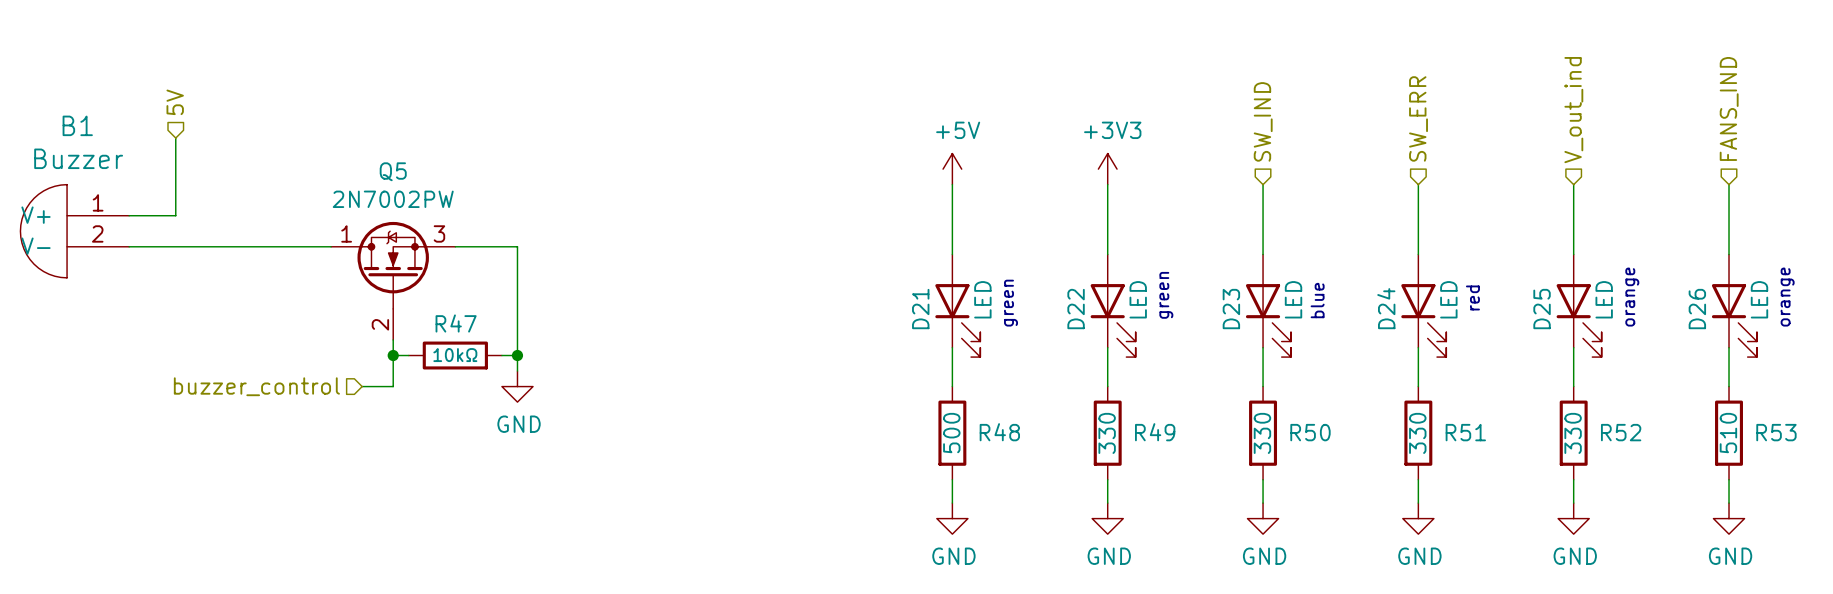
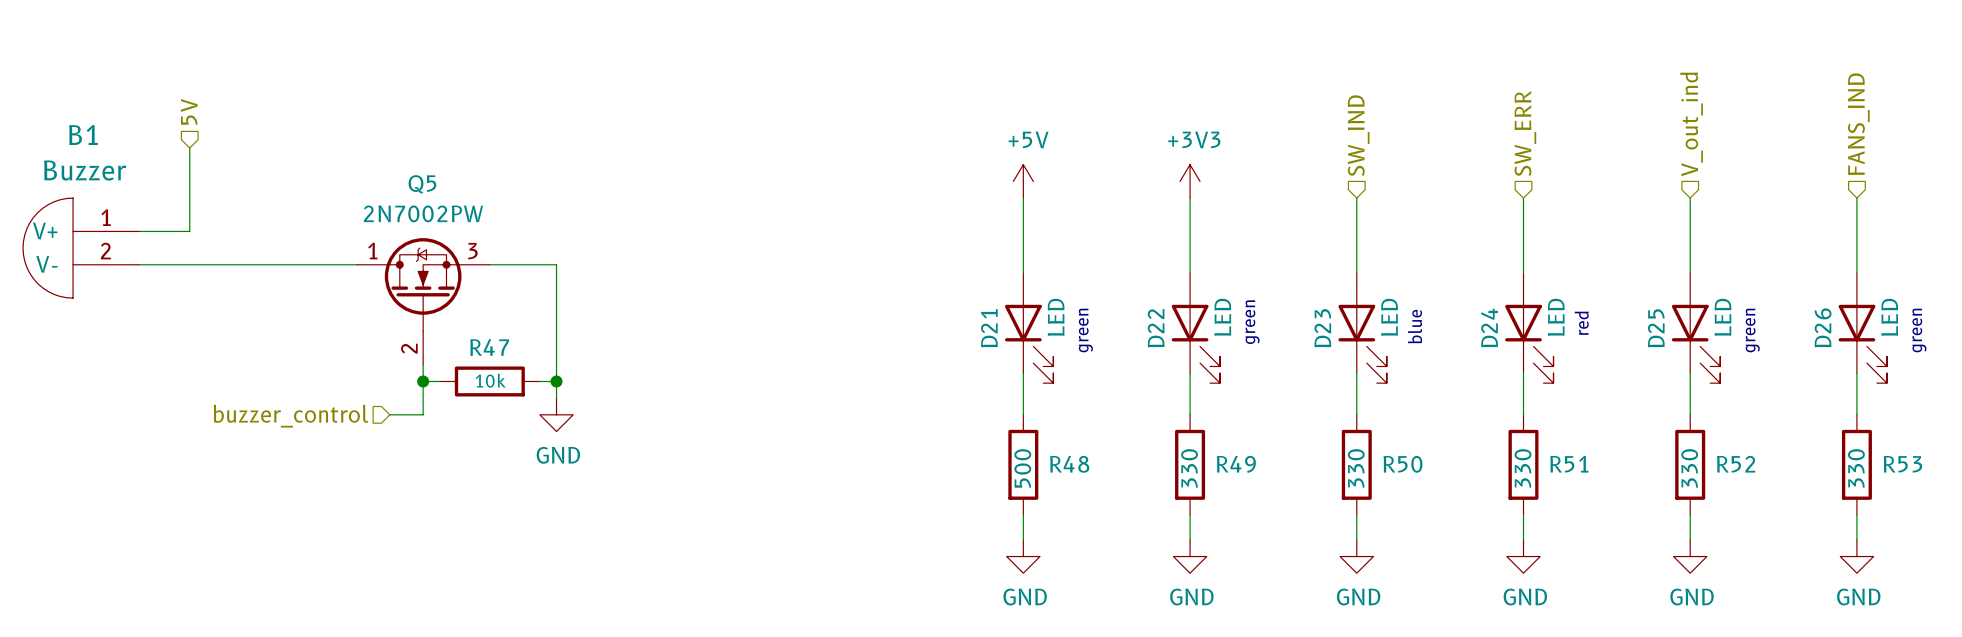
text: orange (1632, 297) -> green (1752, 330)
text: orange (1787, 297) -> green (1919, 330)
R47 value: 10kΩ (455, 355) -> 10k (490, 380)
R53 value: 510 (1728, 433) -> 330 (1856, 468)

